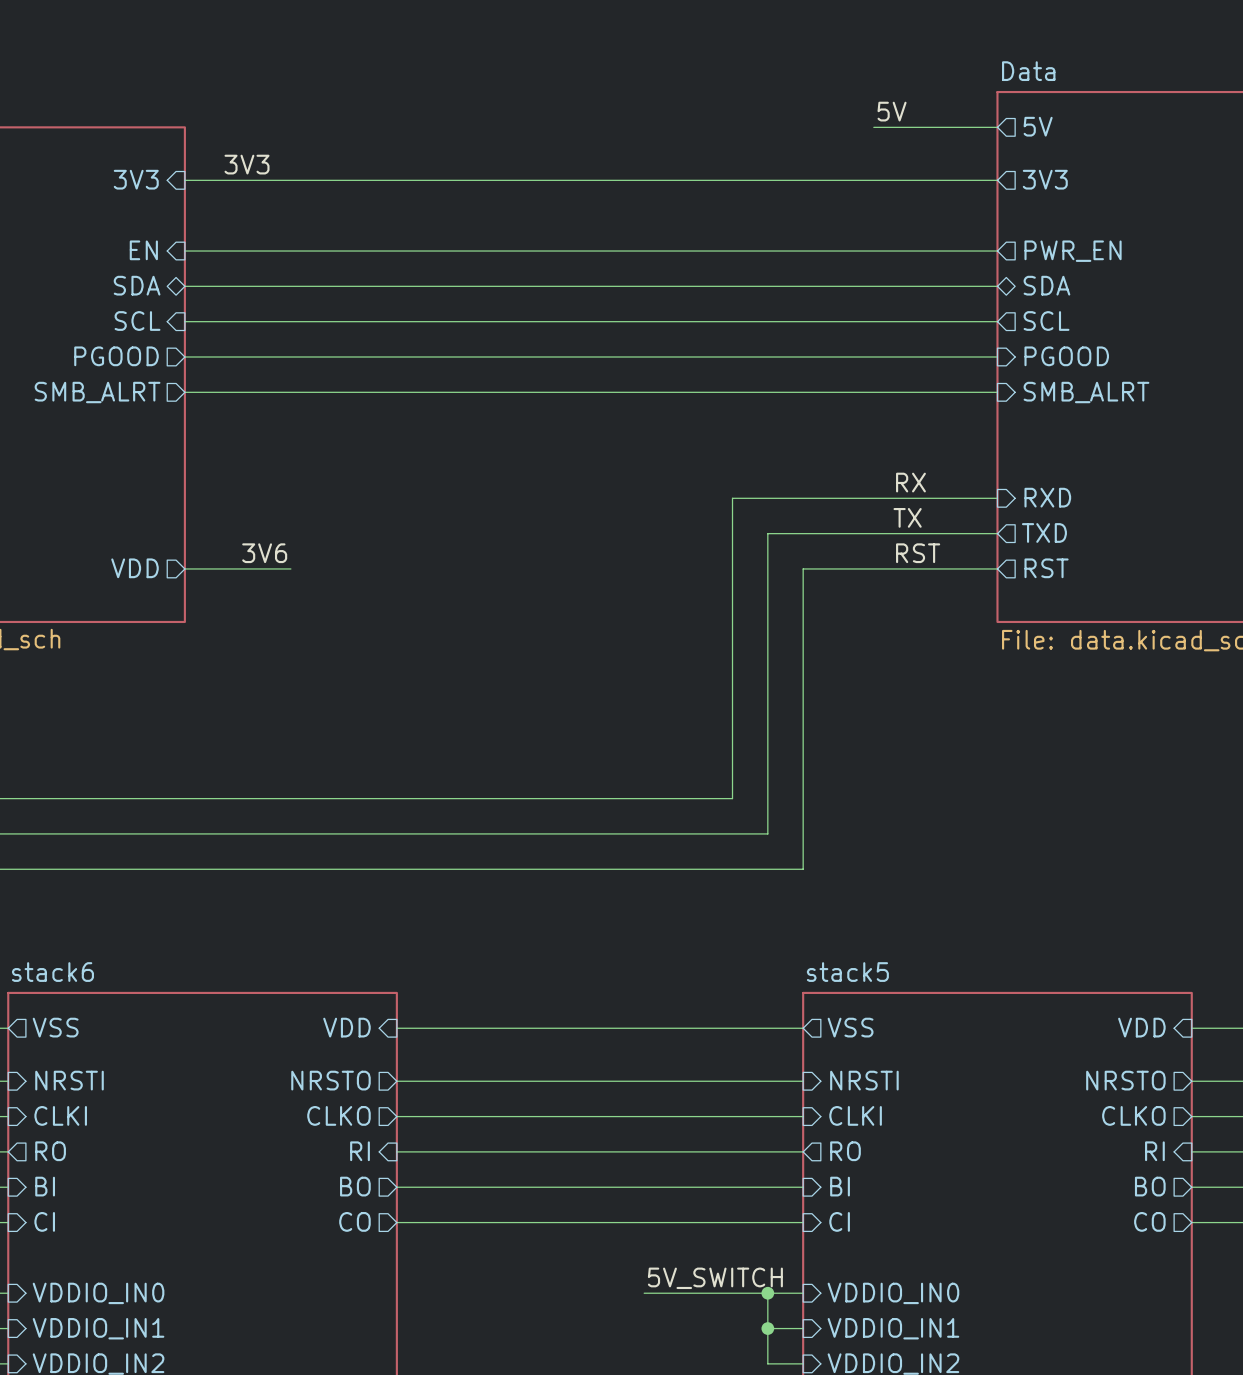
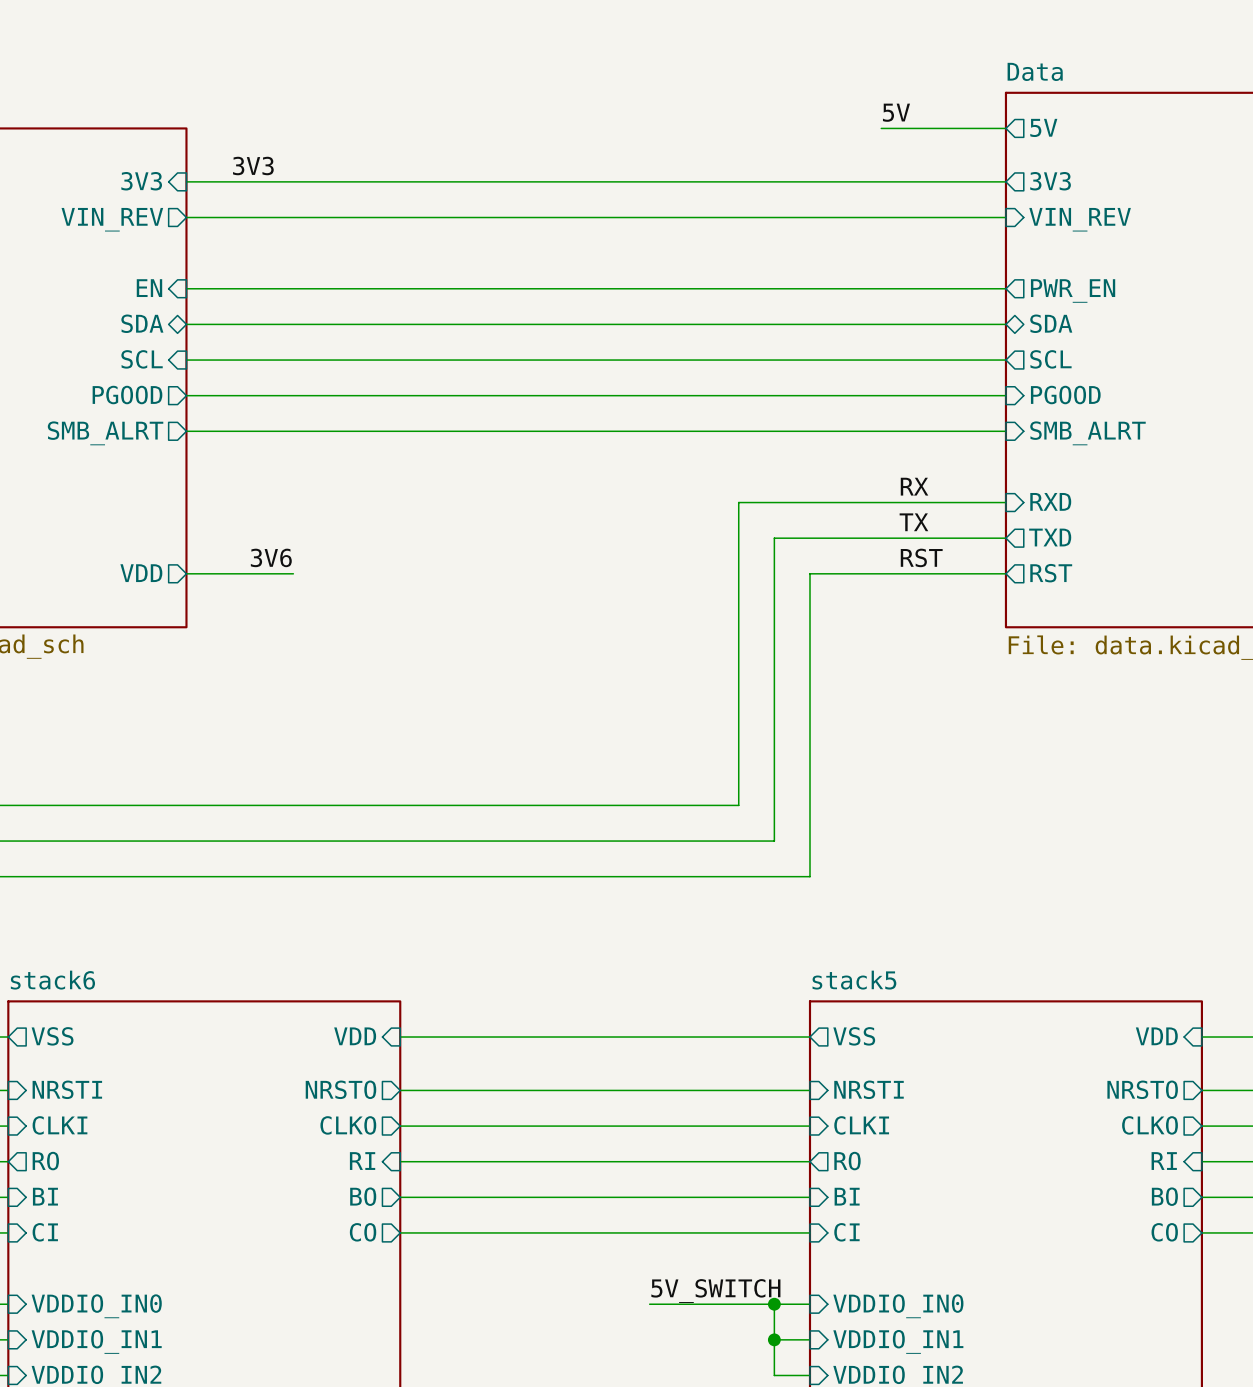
sheet pin: none -> VIN_REV (112, 219)
sheet pin: none -> VIN_REV (1080, 219)
sheet pin: EN (143, 250) -> none
wire: (184, 251) (997, 251) -> (186, 217) (1005, 217)
sheet pin: PWR_EN (1073, 251) -> none
sheet pin shape: bidirectional (137, 285) -> input (149, 288)
sheet pin: SDA (137, 285) -> EN (149, 288)
sheet pin shape: bidirectional (1046, 285) -> output (1073, 290)
sheet pin: SDA (1046, 285) -> PWR_EN (1073, 290)
sheet pin shape: input (137, 321) -> bidirectional (142, 323)
sheet pin: SCL (137, 321) -> SDA (142, 323)
sheet pin shape: output (1046, 321) -> bidirectional (1051, 323)
sheet pin: SCL (1046, 321) -> SDA (1051, 323)
sheet pin shape: output (116, 356) -> input (142, 359)
sheet pin: PGOOD (116, 356) -> SCL (142, 359)
sheet pin shape: input (1066, 356) -> output (1050, 359)
sheet pin: PGOOD (1066, 356) -> SCL (1050, 359)
sheet pin: SMB_ALRT (97, 392) -> PGOOD (127, 395)
sheet pin: SMB_ALRT (1086, 392) -> PGOOD (1065, 395)
sheet pin: none -> SMB_ALRT (105, 433)
wire: none -> (186, 431) (1005, 431)
sheet pin: none -> SMB_ALRT (1087, 433)

